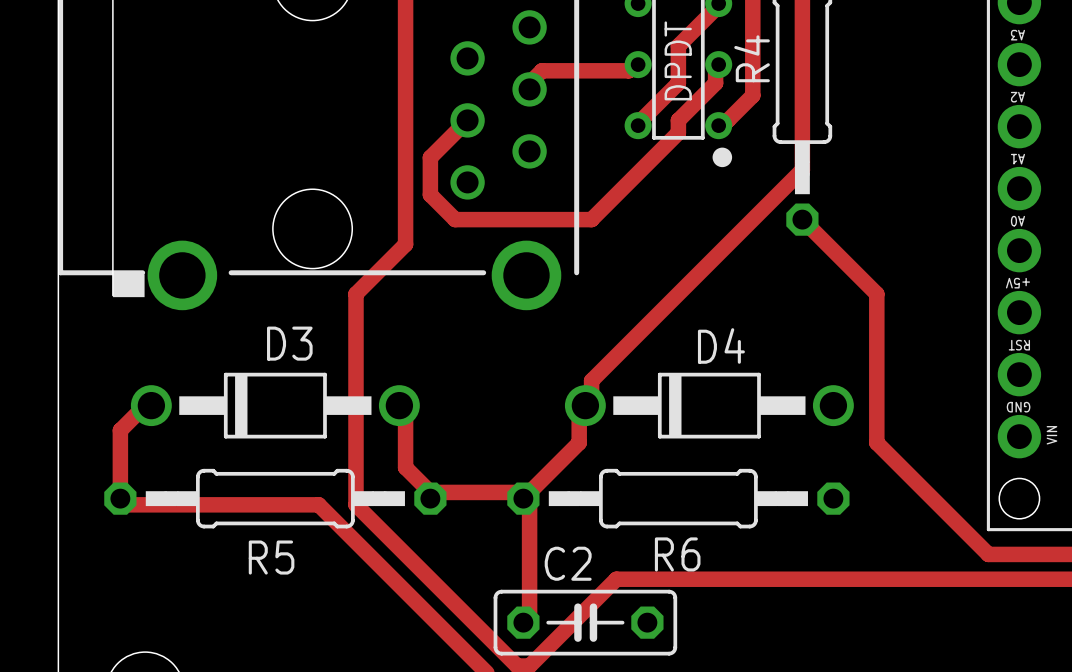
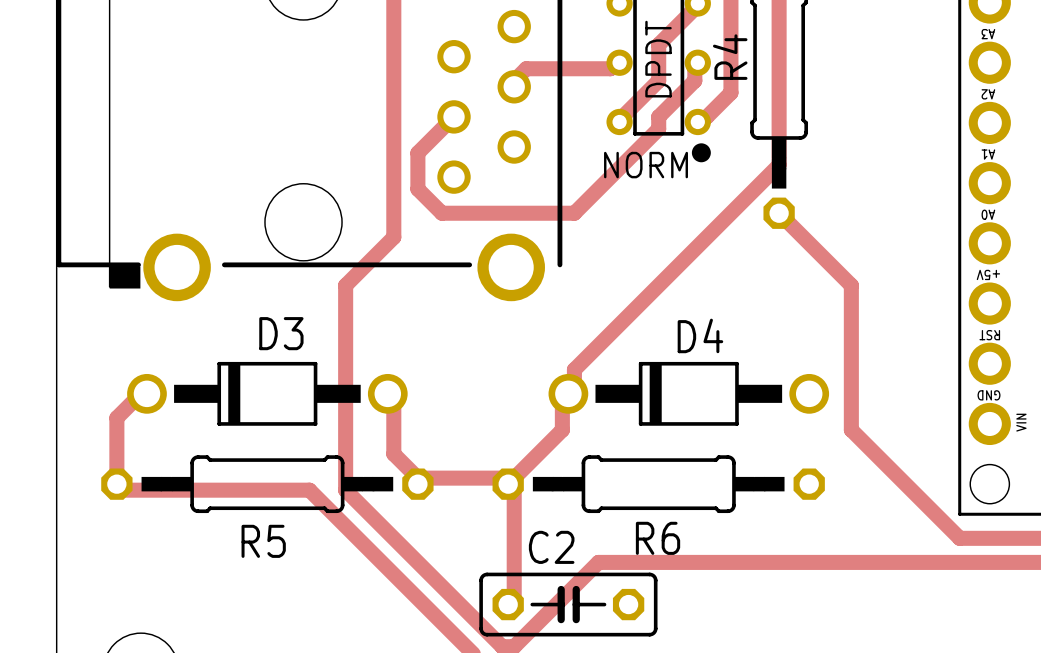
text: none -> NORM (646, 165)

